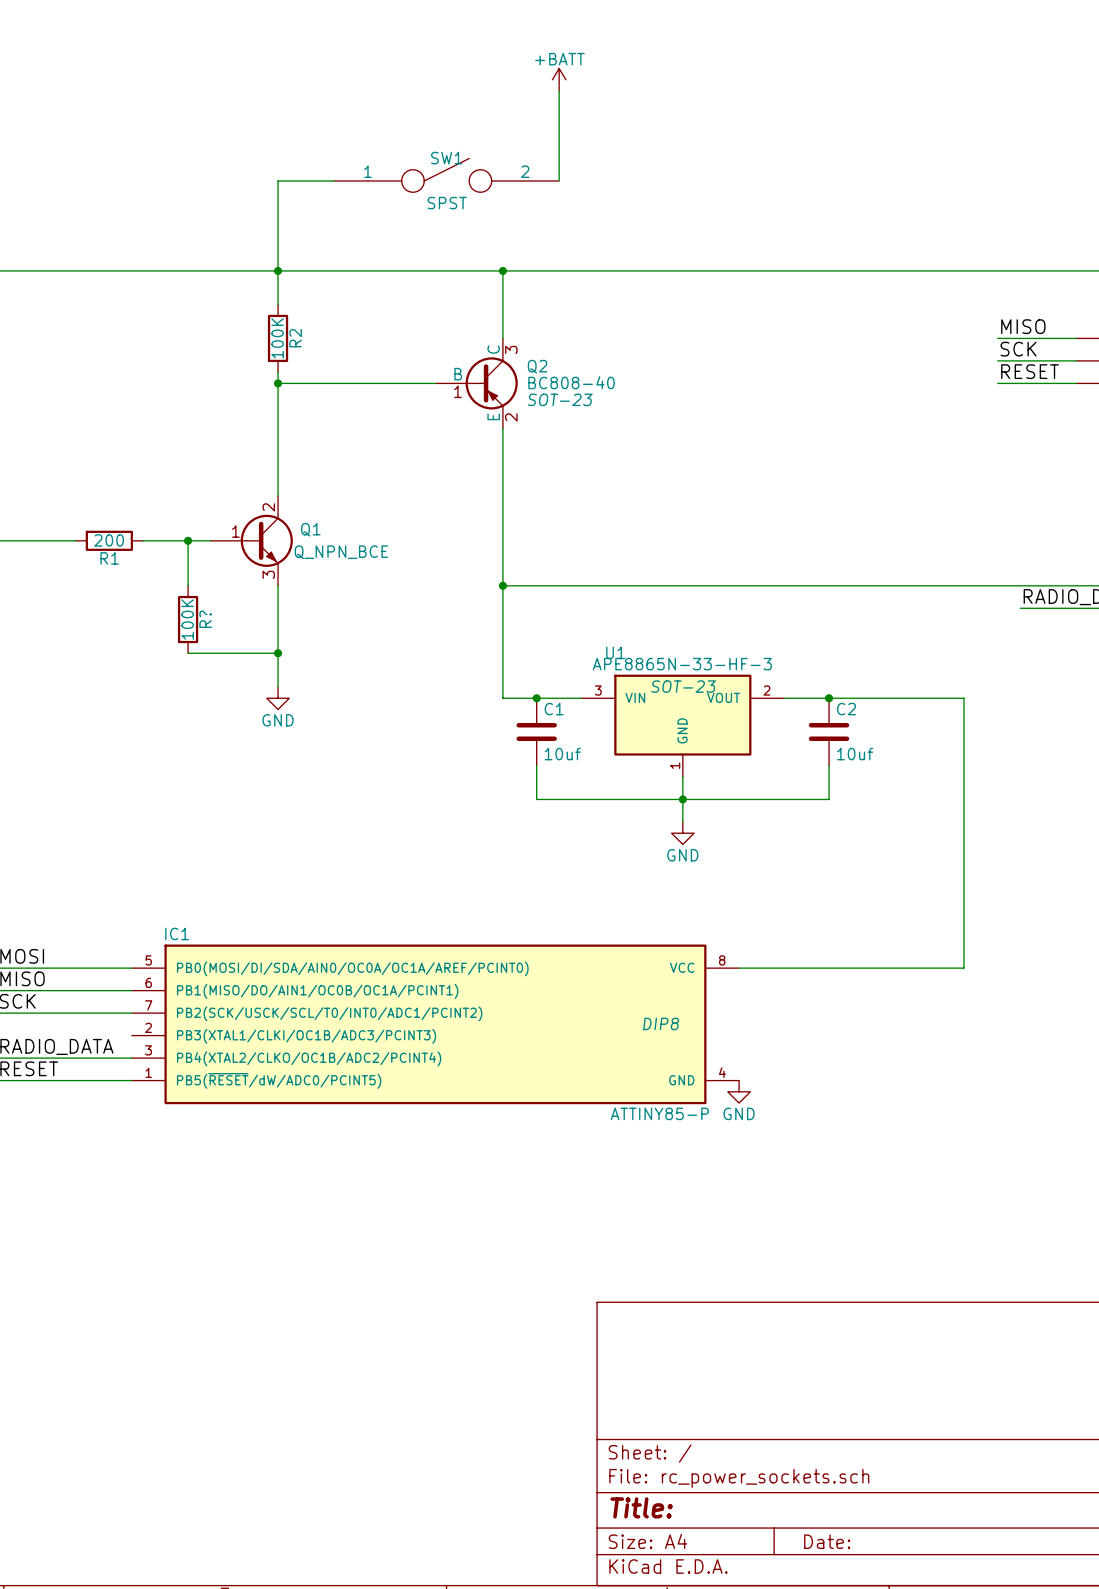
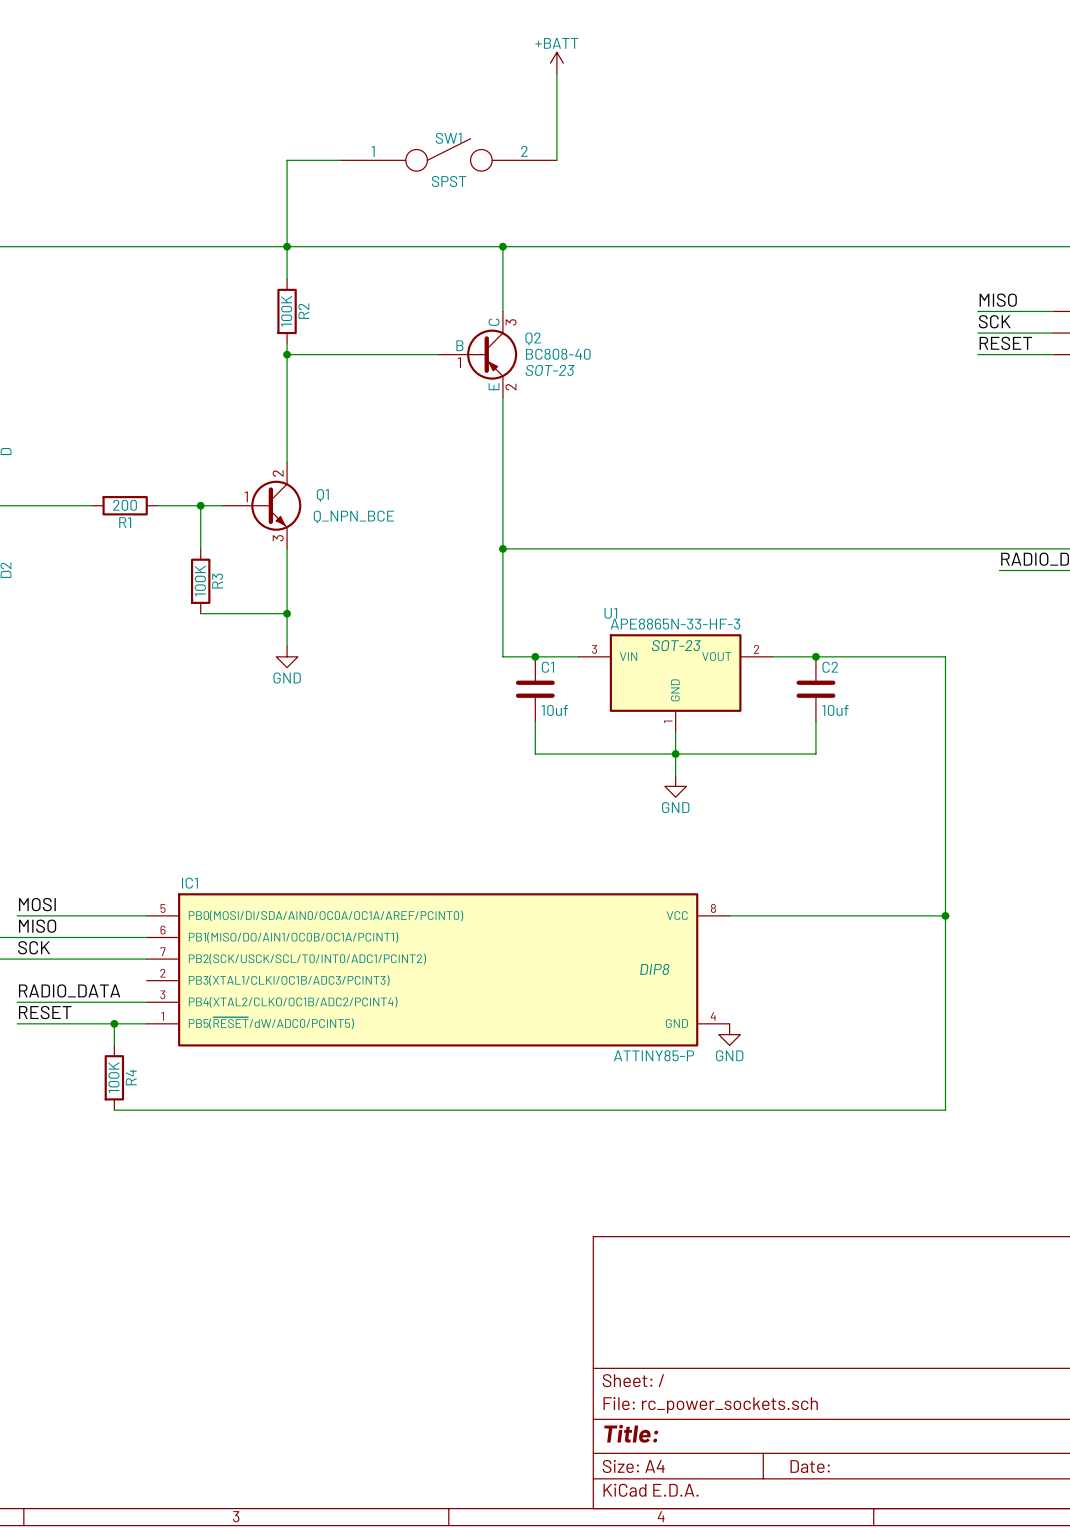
R? name: R? (205, 619) -> R3 (217, 581)
wire: none -> (945, 915) (945, 1110) (114, 1110)
junction: none -> (945, 915)
wire: none -> (114, 1023) (114, 1045)
junction: none -> (114, 1023)
R4: none -> 100K (114, 1077)

